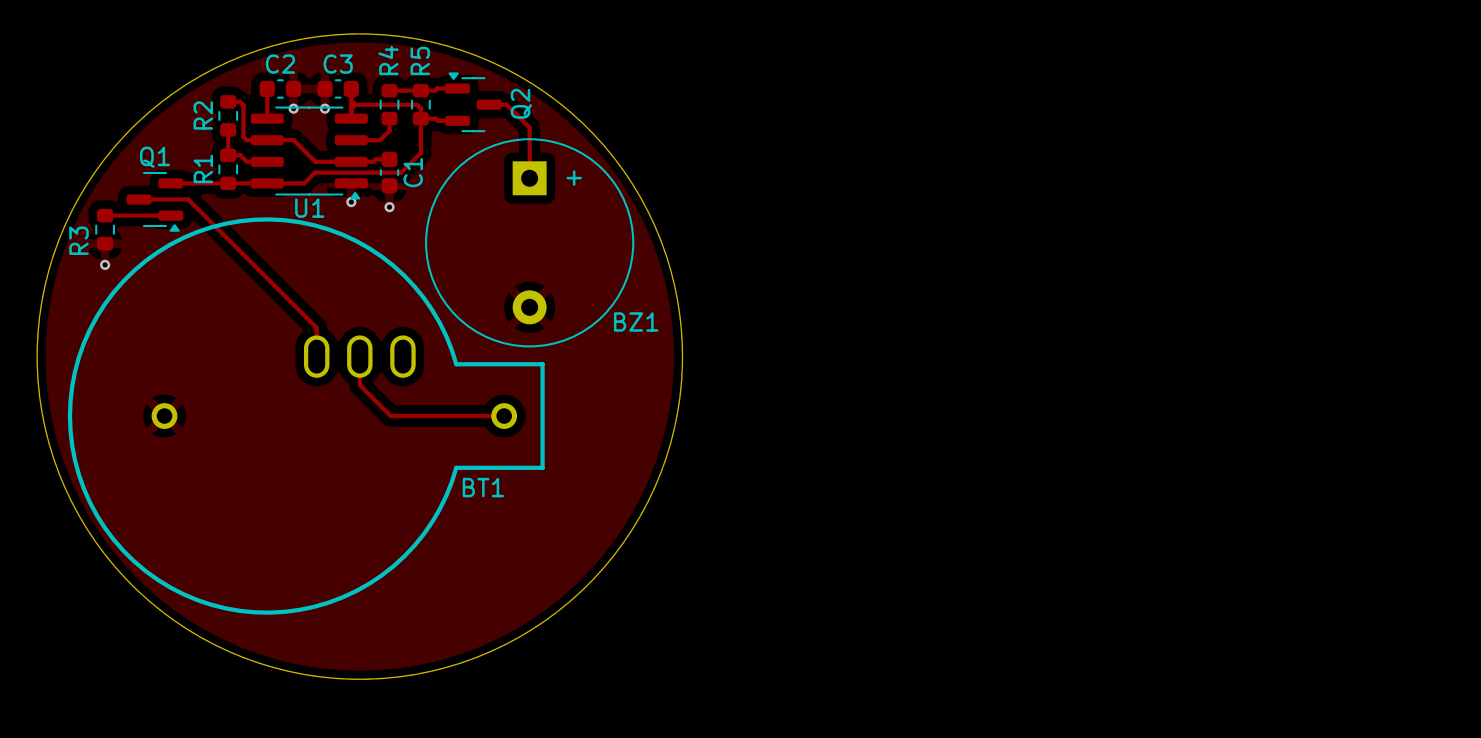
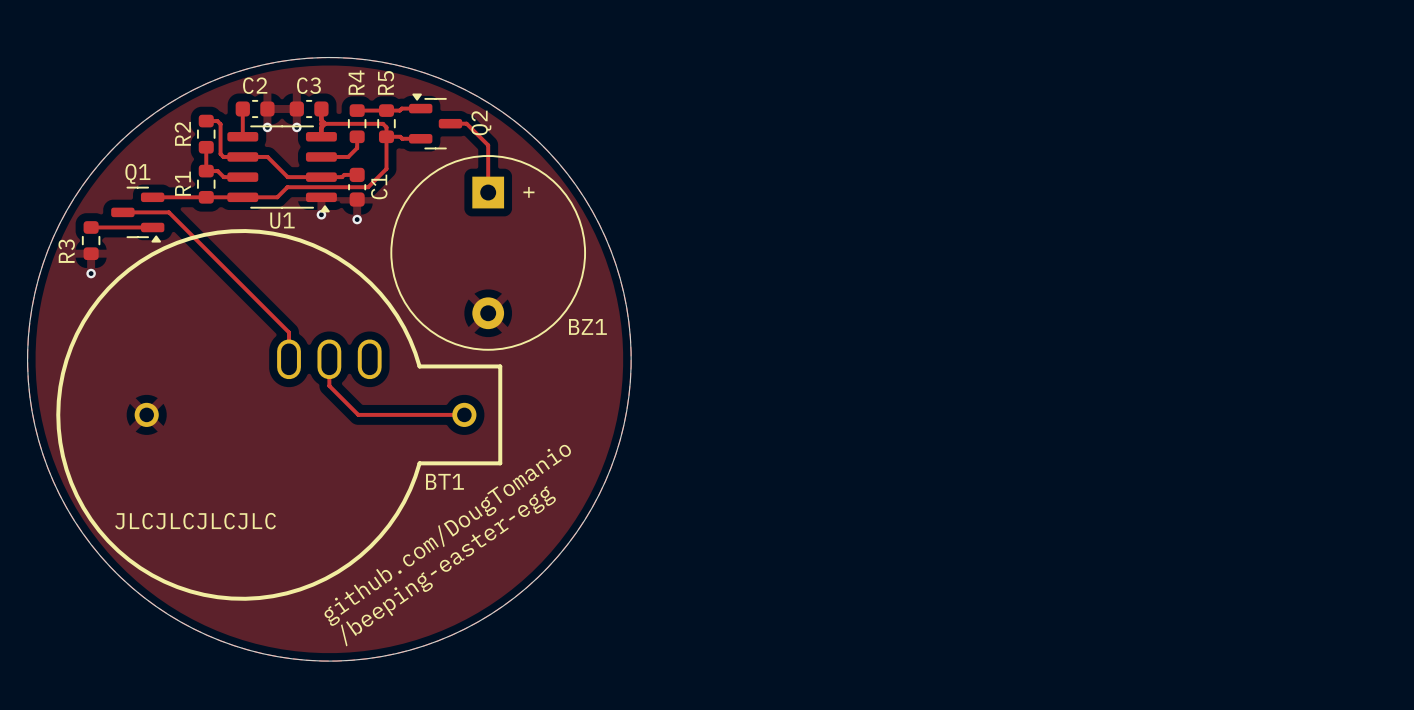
text: none -> JLCJLCJLCJLC (195, 521)
text: none -> github.com/DougTomanio (447, 535)
text: none -> /beeping-easter-egg (448, 566)

